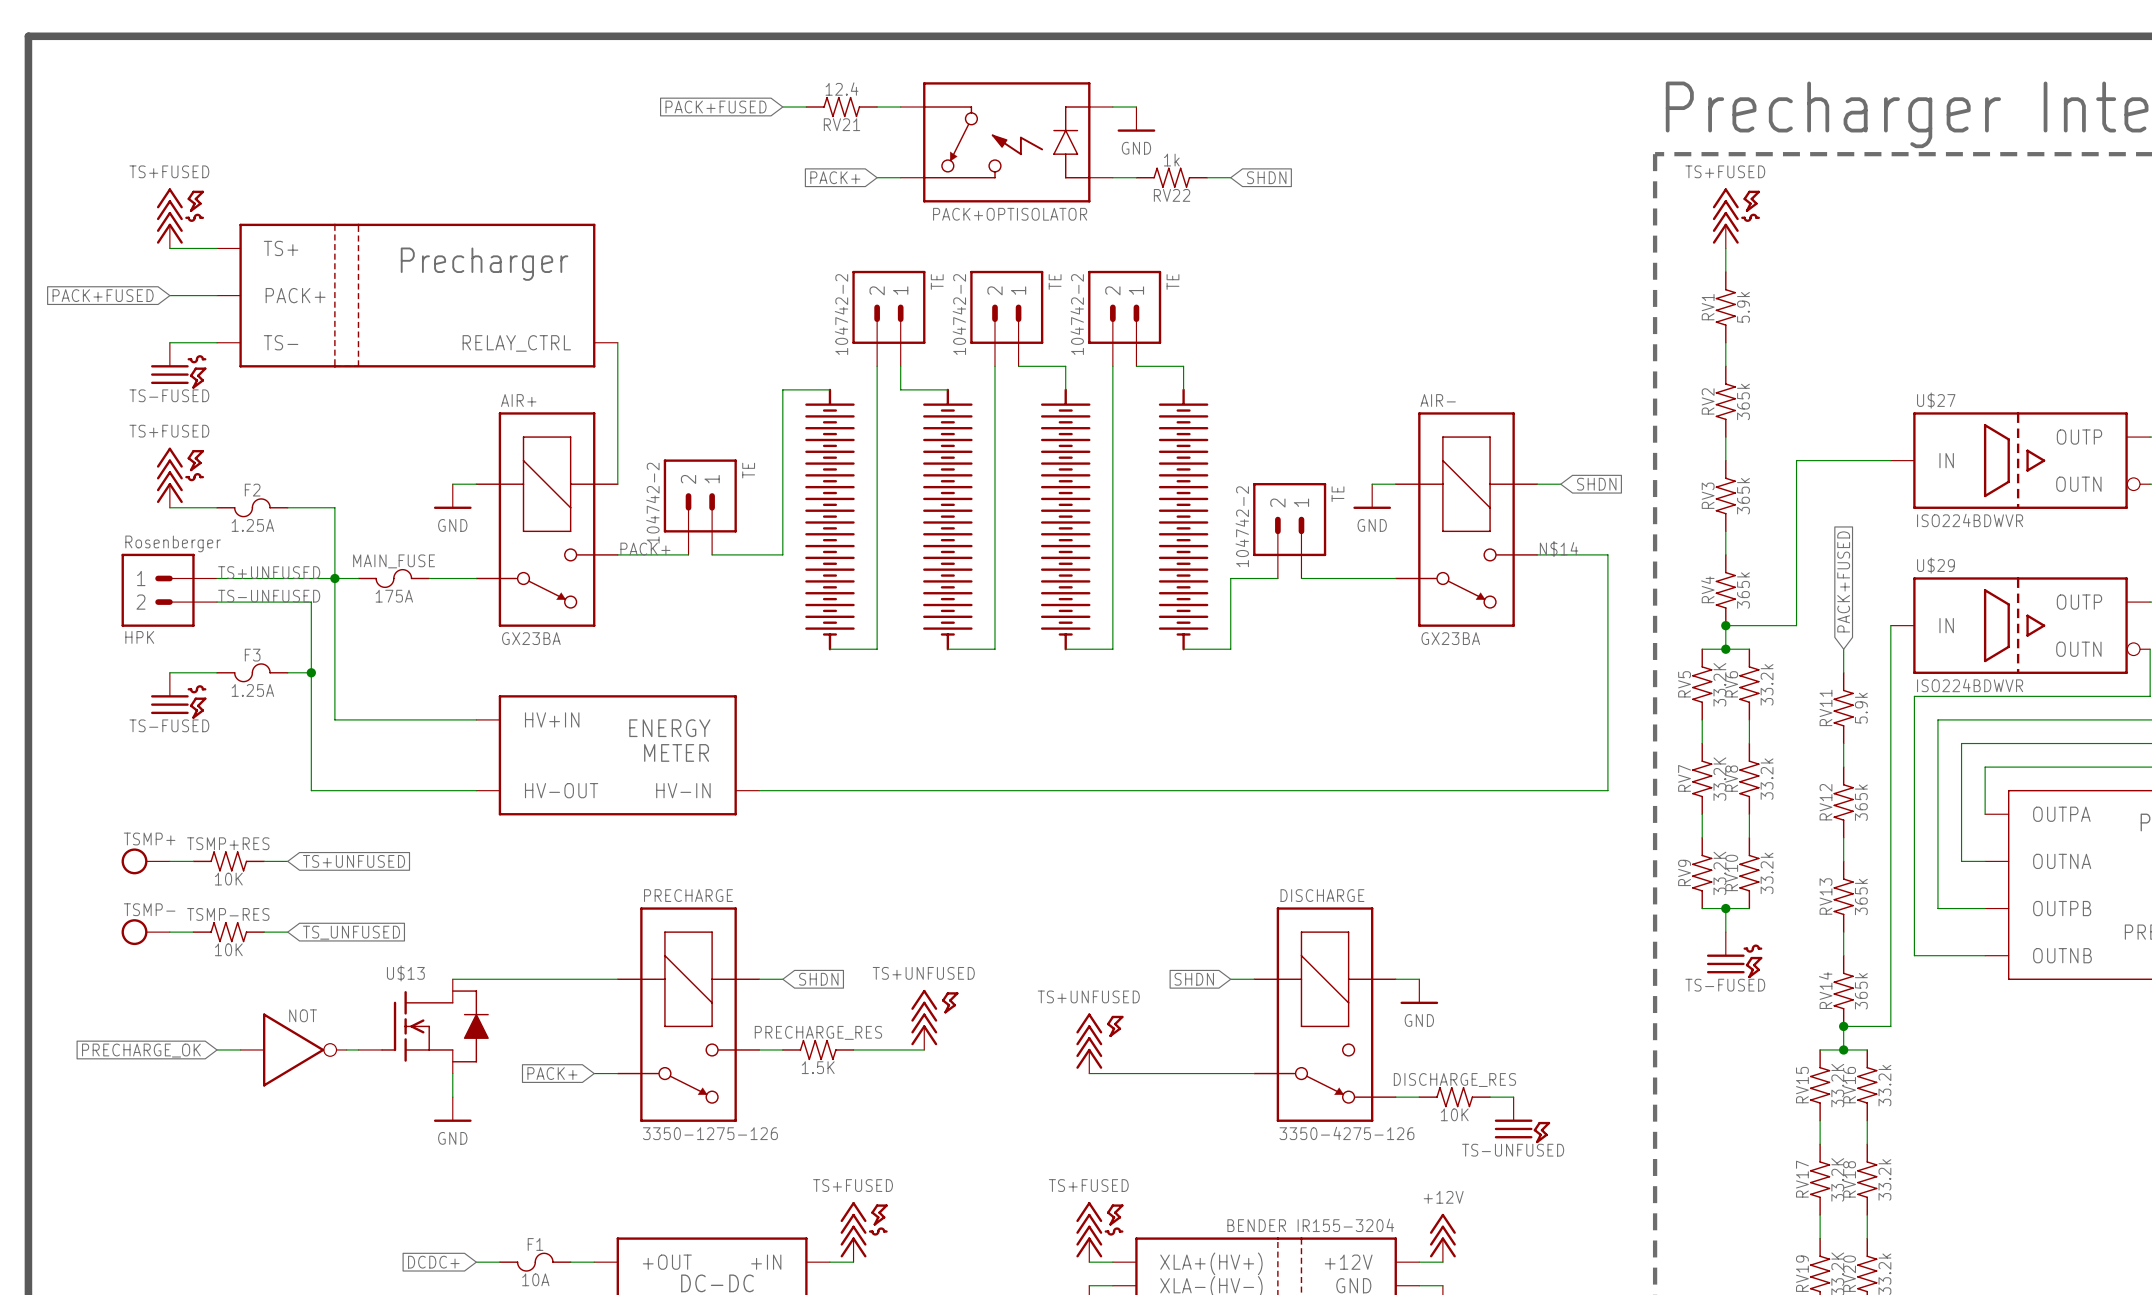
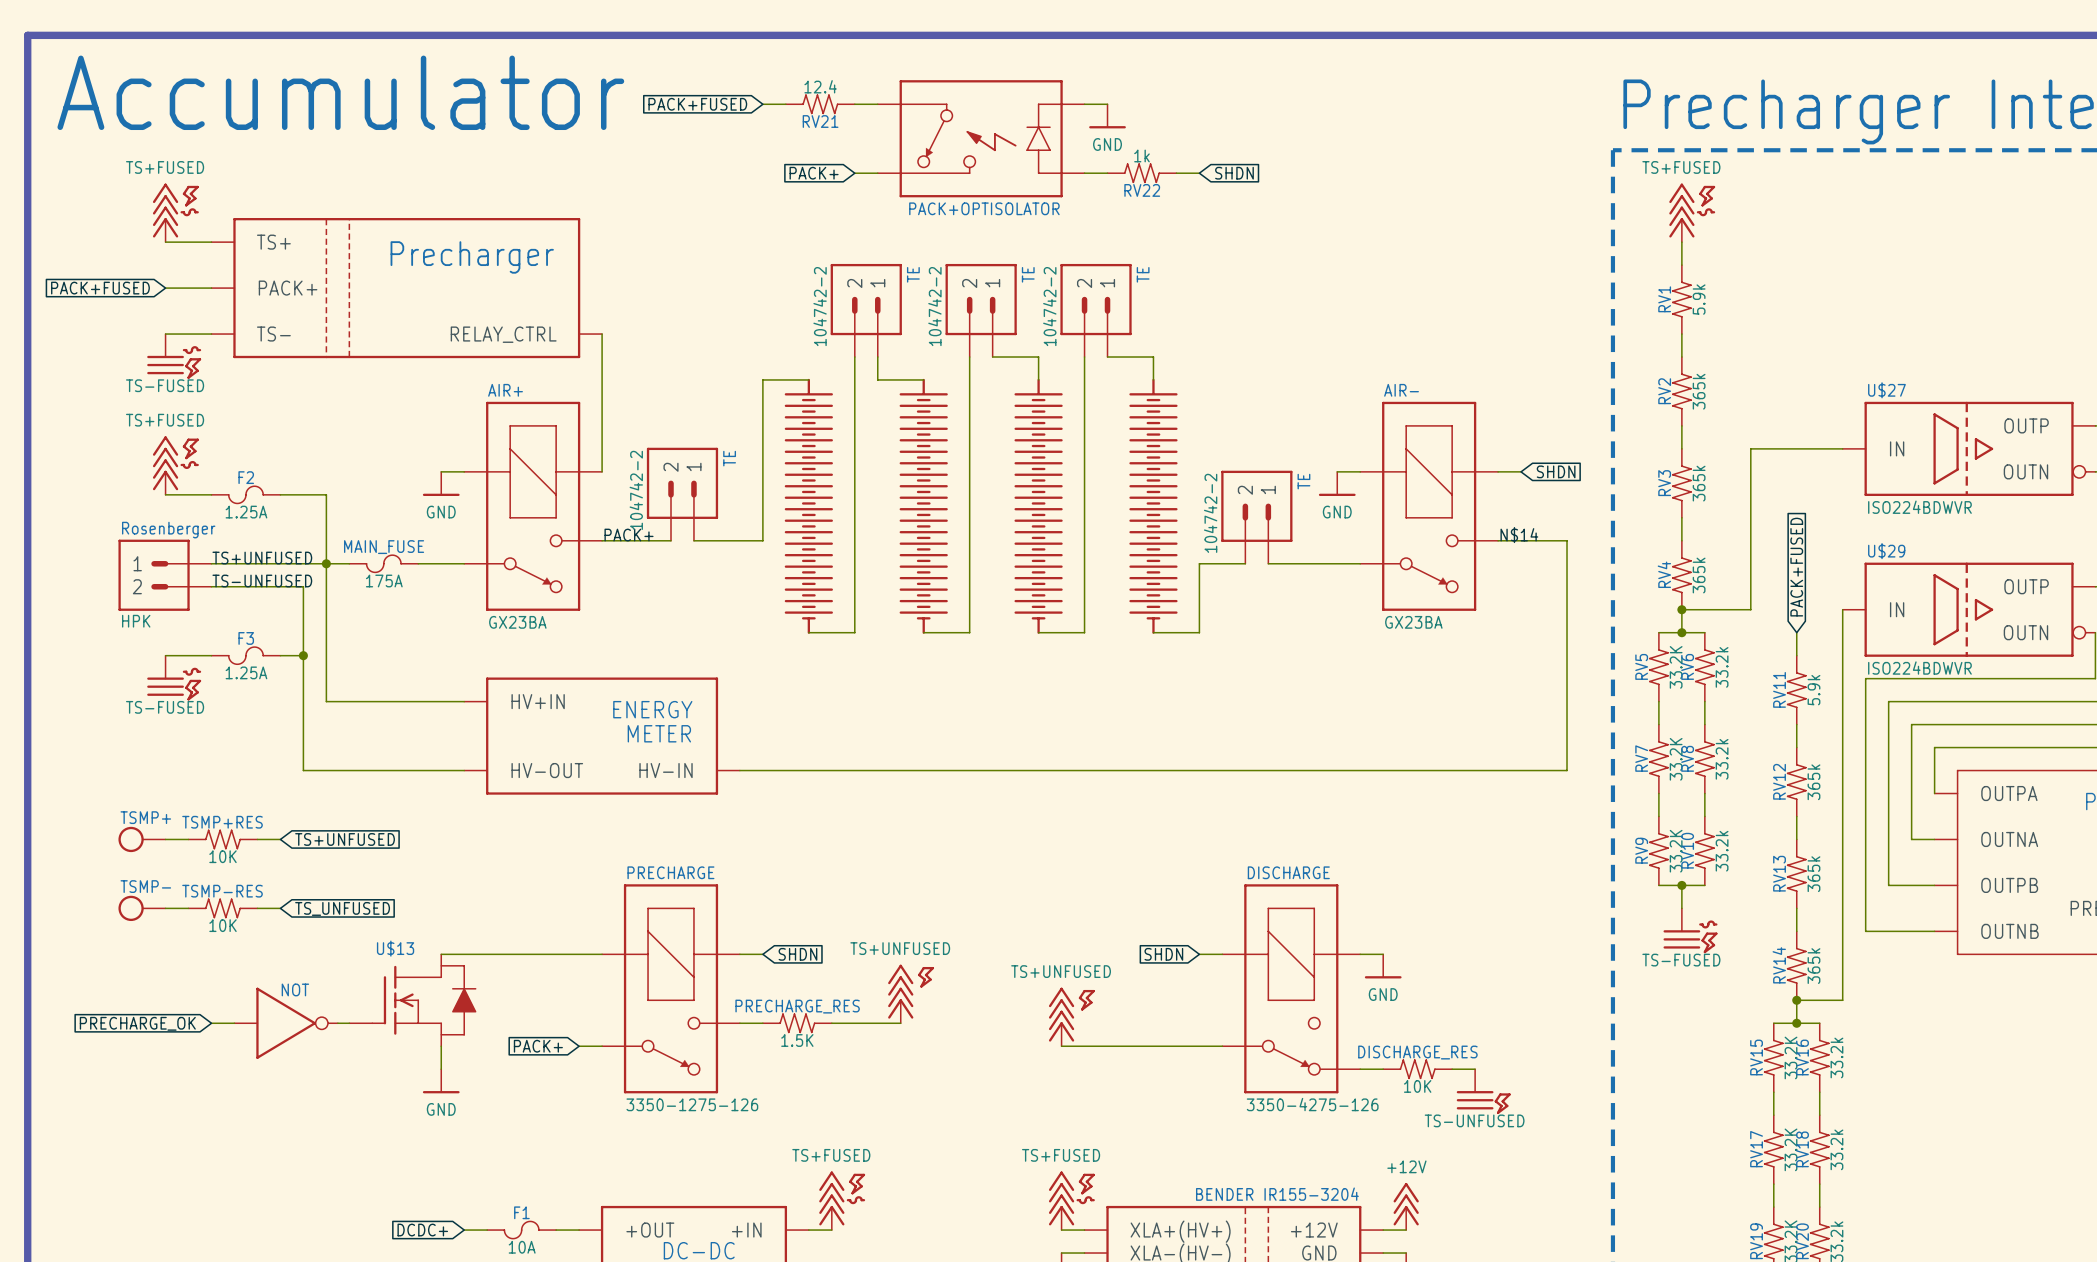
text: none -> Accumulator (340, 92)

